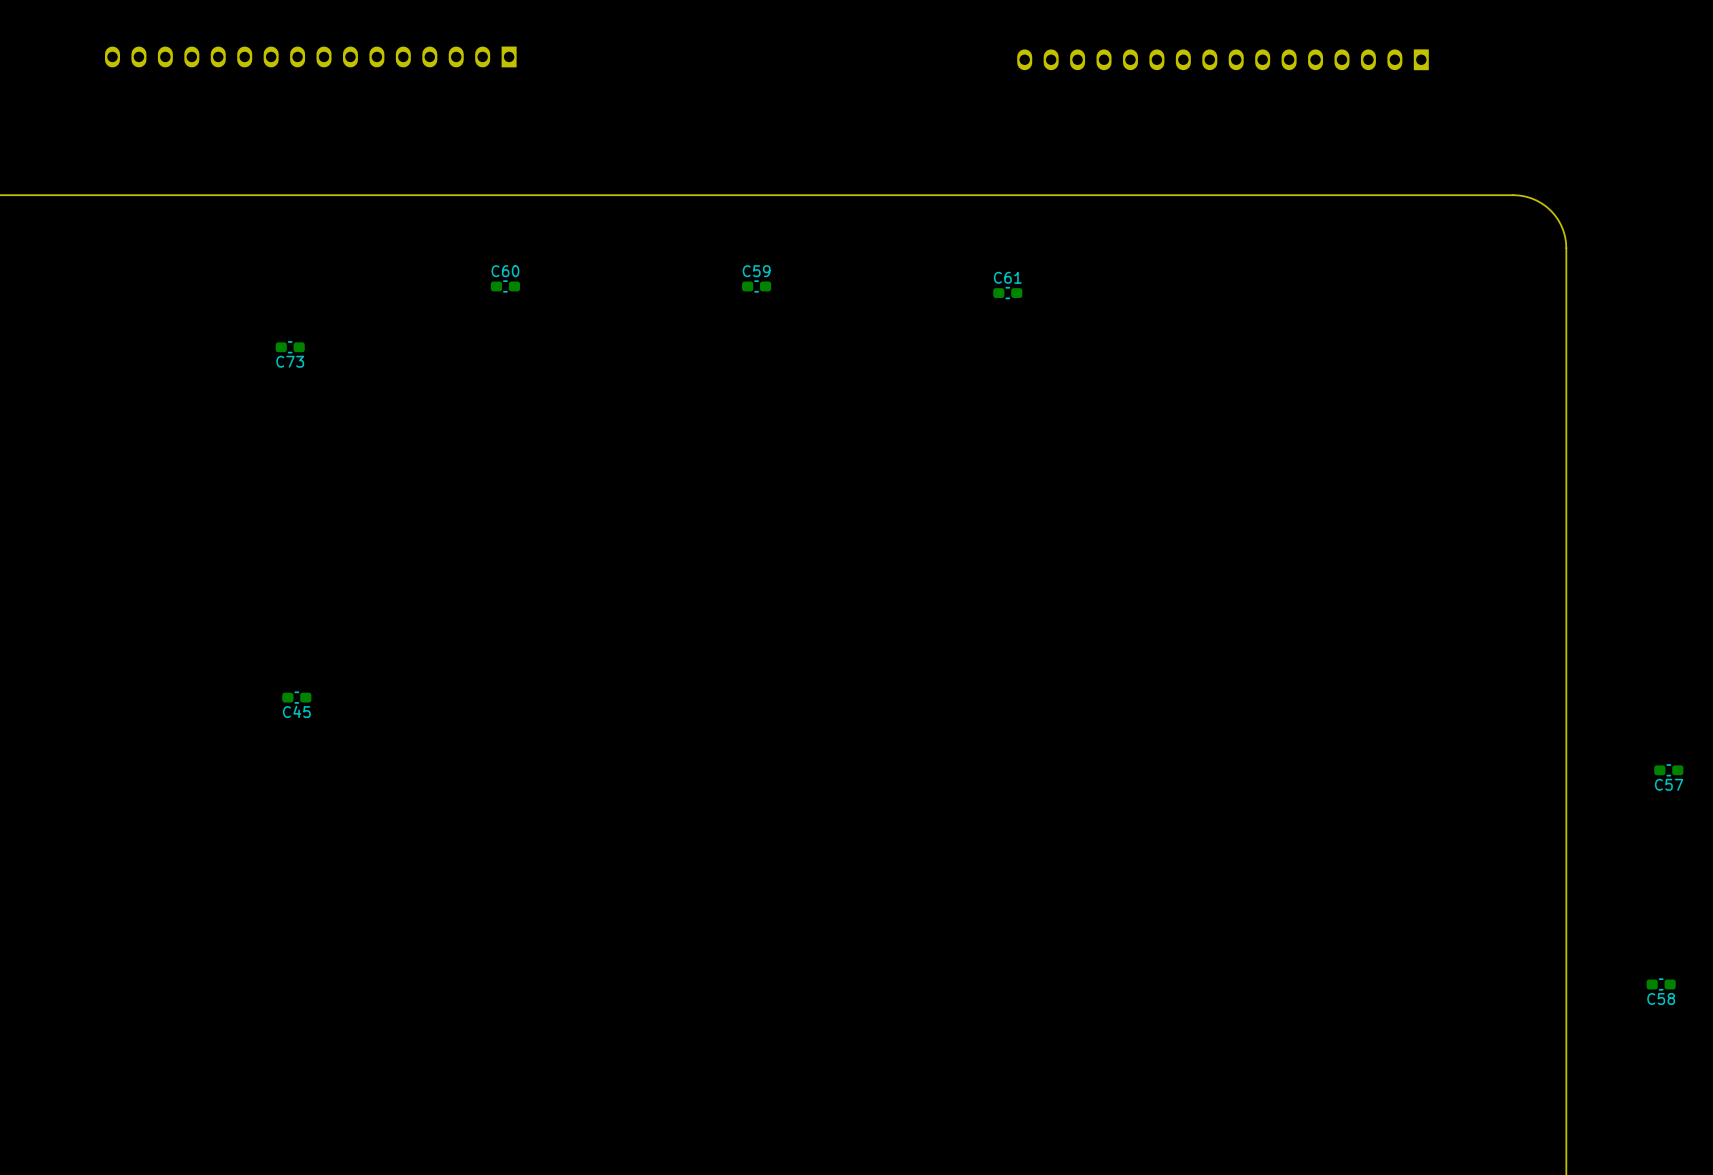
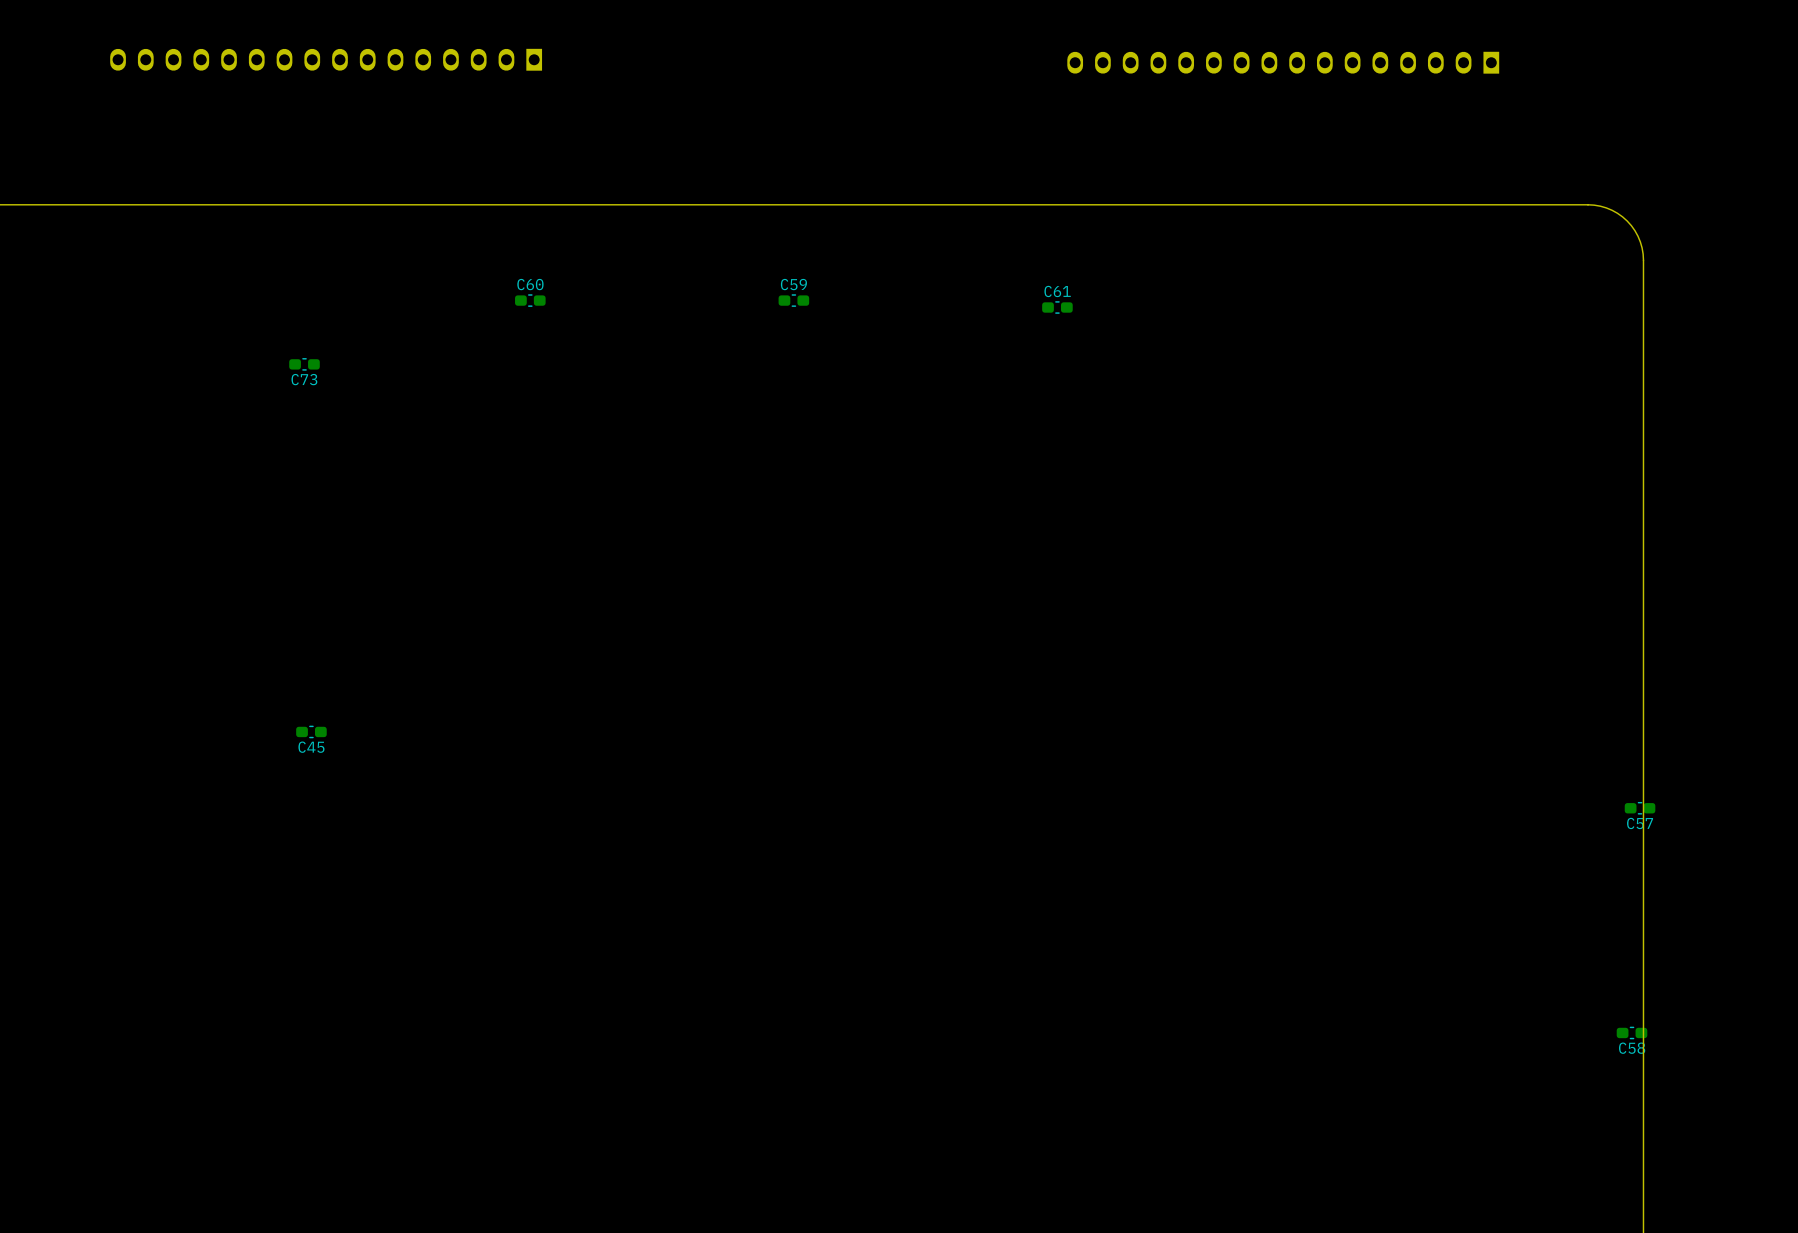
C57 position: (1668, 770) -> (1640, 808)
C58 position: (1661, 984) -> (1632, 1032)

